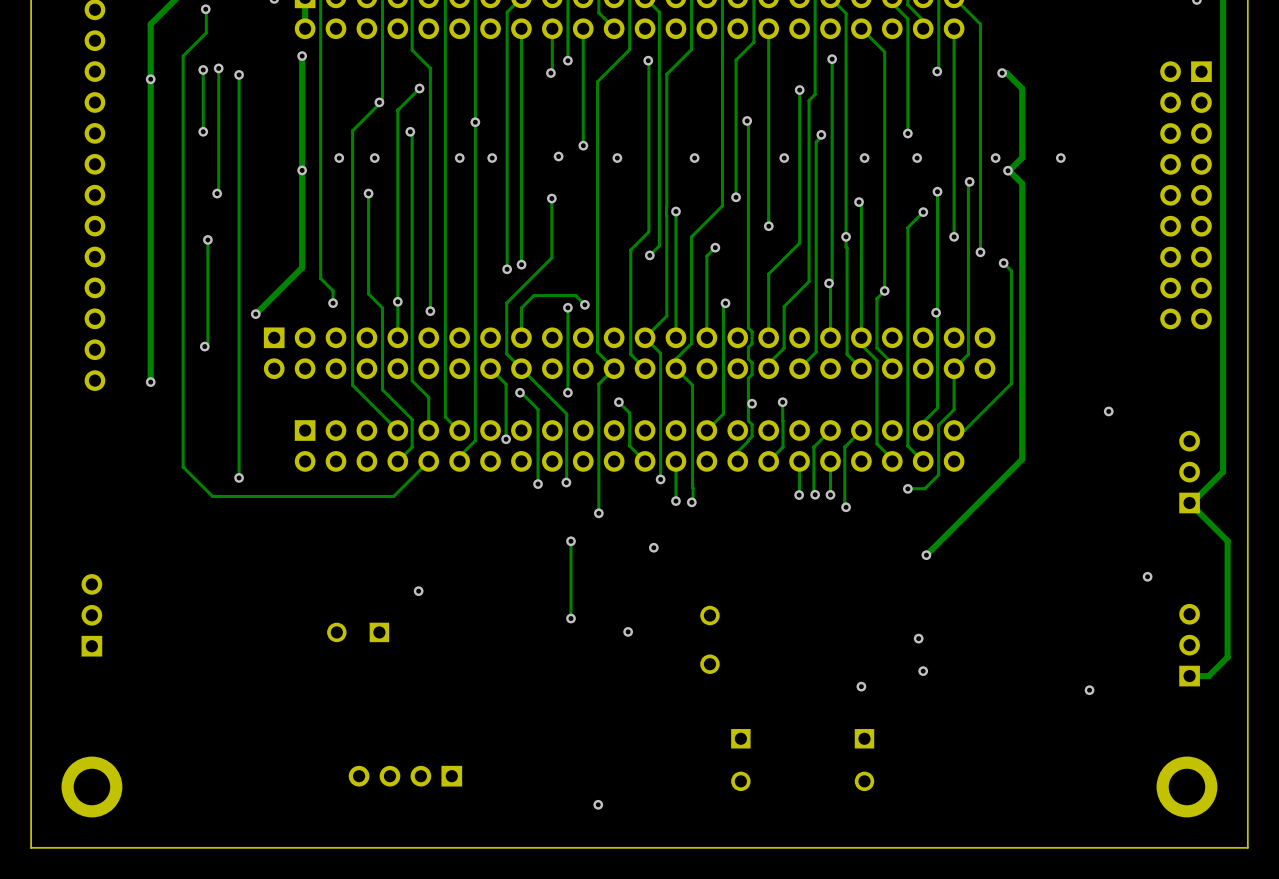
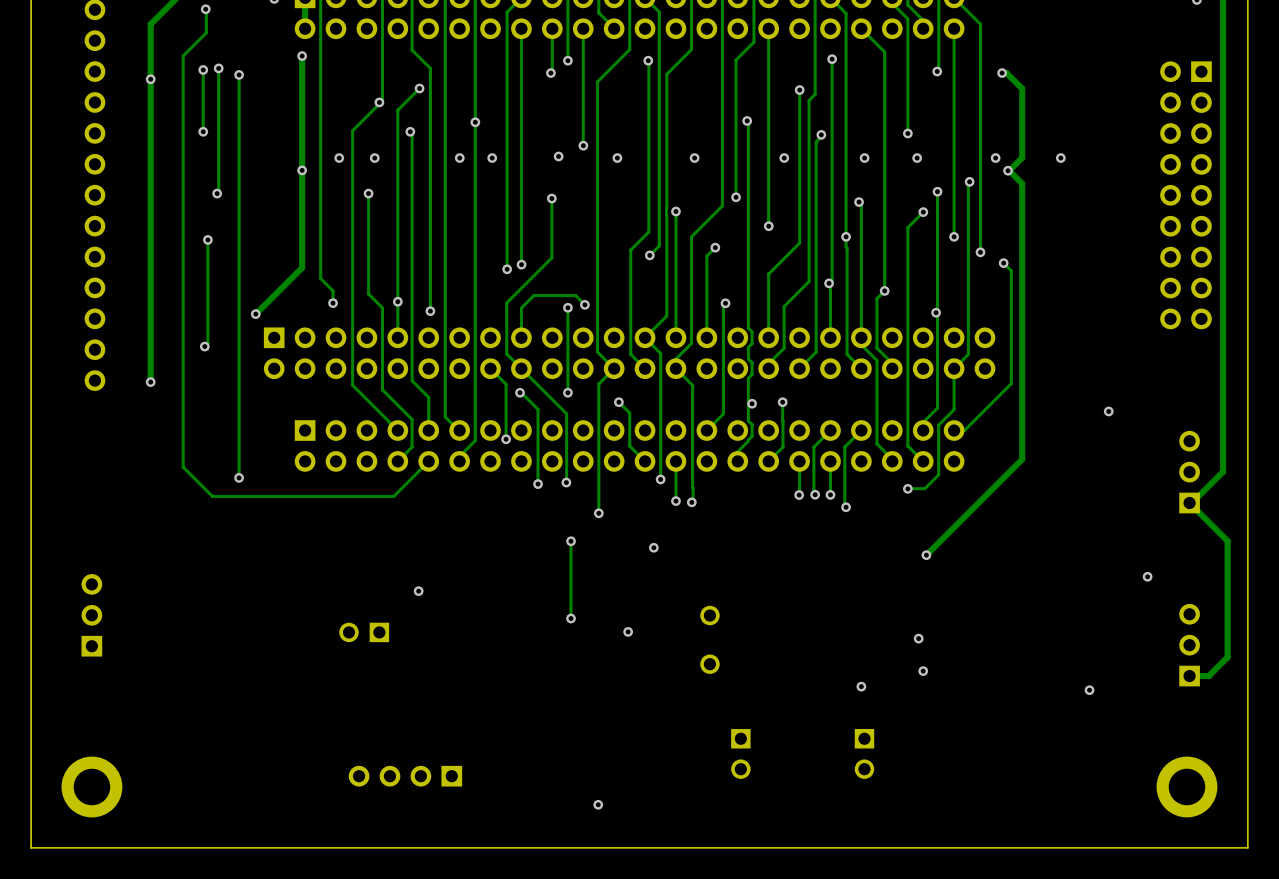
part footprint: [327, 622, 390, 643] -> [339, 622, 390, 643]
part footprint: [731, 729, 751, 792] -> [731, 729, 751, 779]
part footprint: [854, 729, 875, 792] -> [854, 729, 875, 779]

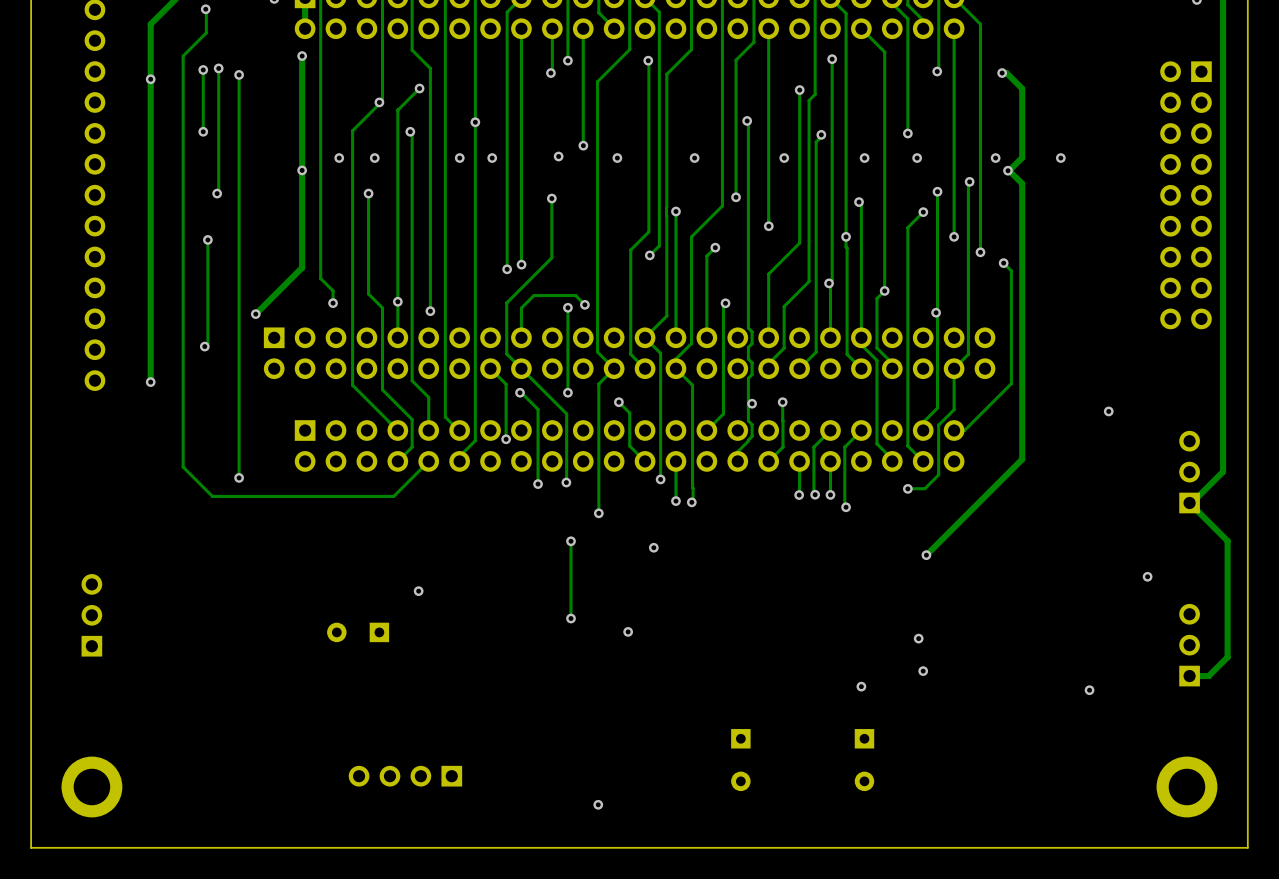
part footprint: [339, 622, 390, 643] -> [327, 622, 390, 643]
part: (709, 639) -> none
part footprint: [731, 729, 751, 779] -> [731, 729, 751, 792]
part footprint: [854, 729, 875, 779] -> [854, 729, 875, 792]

